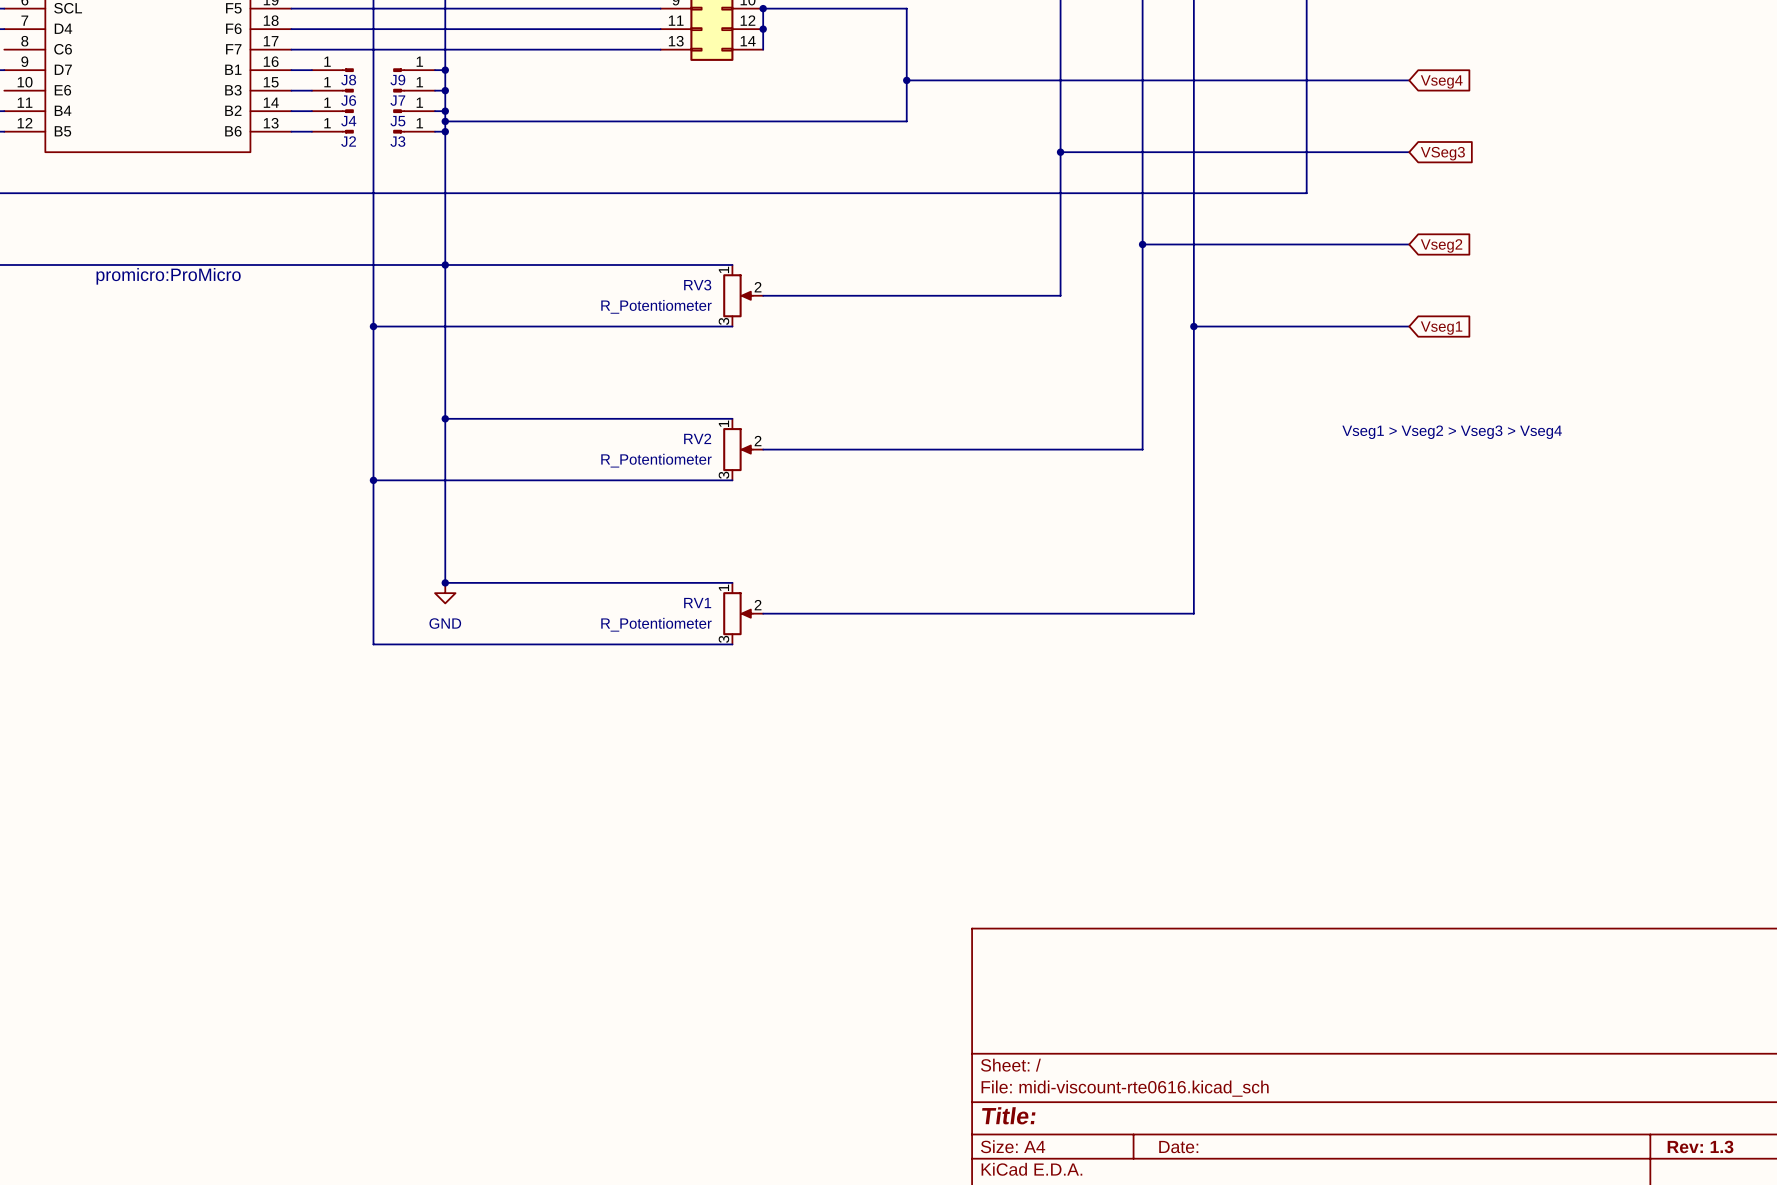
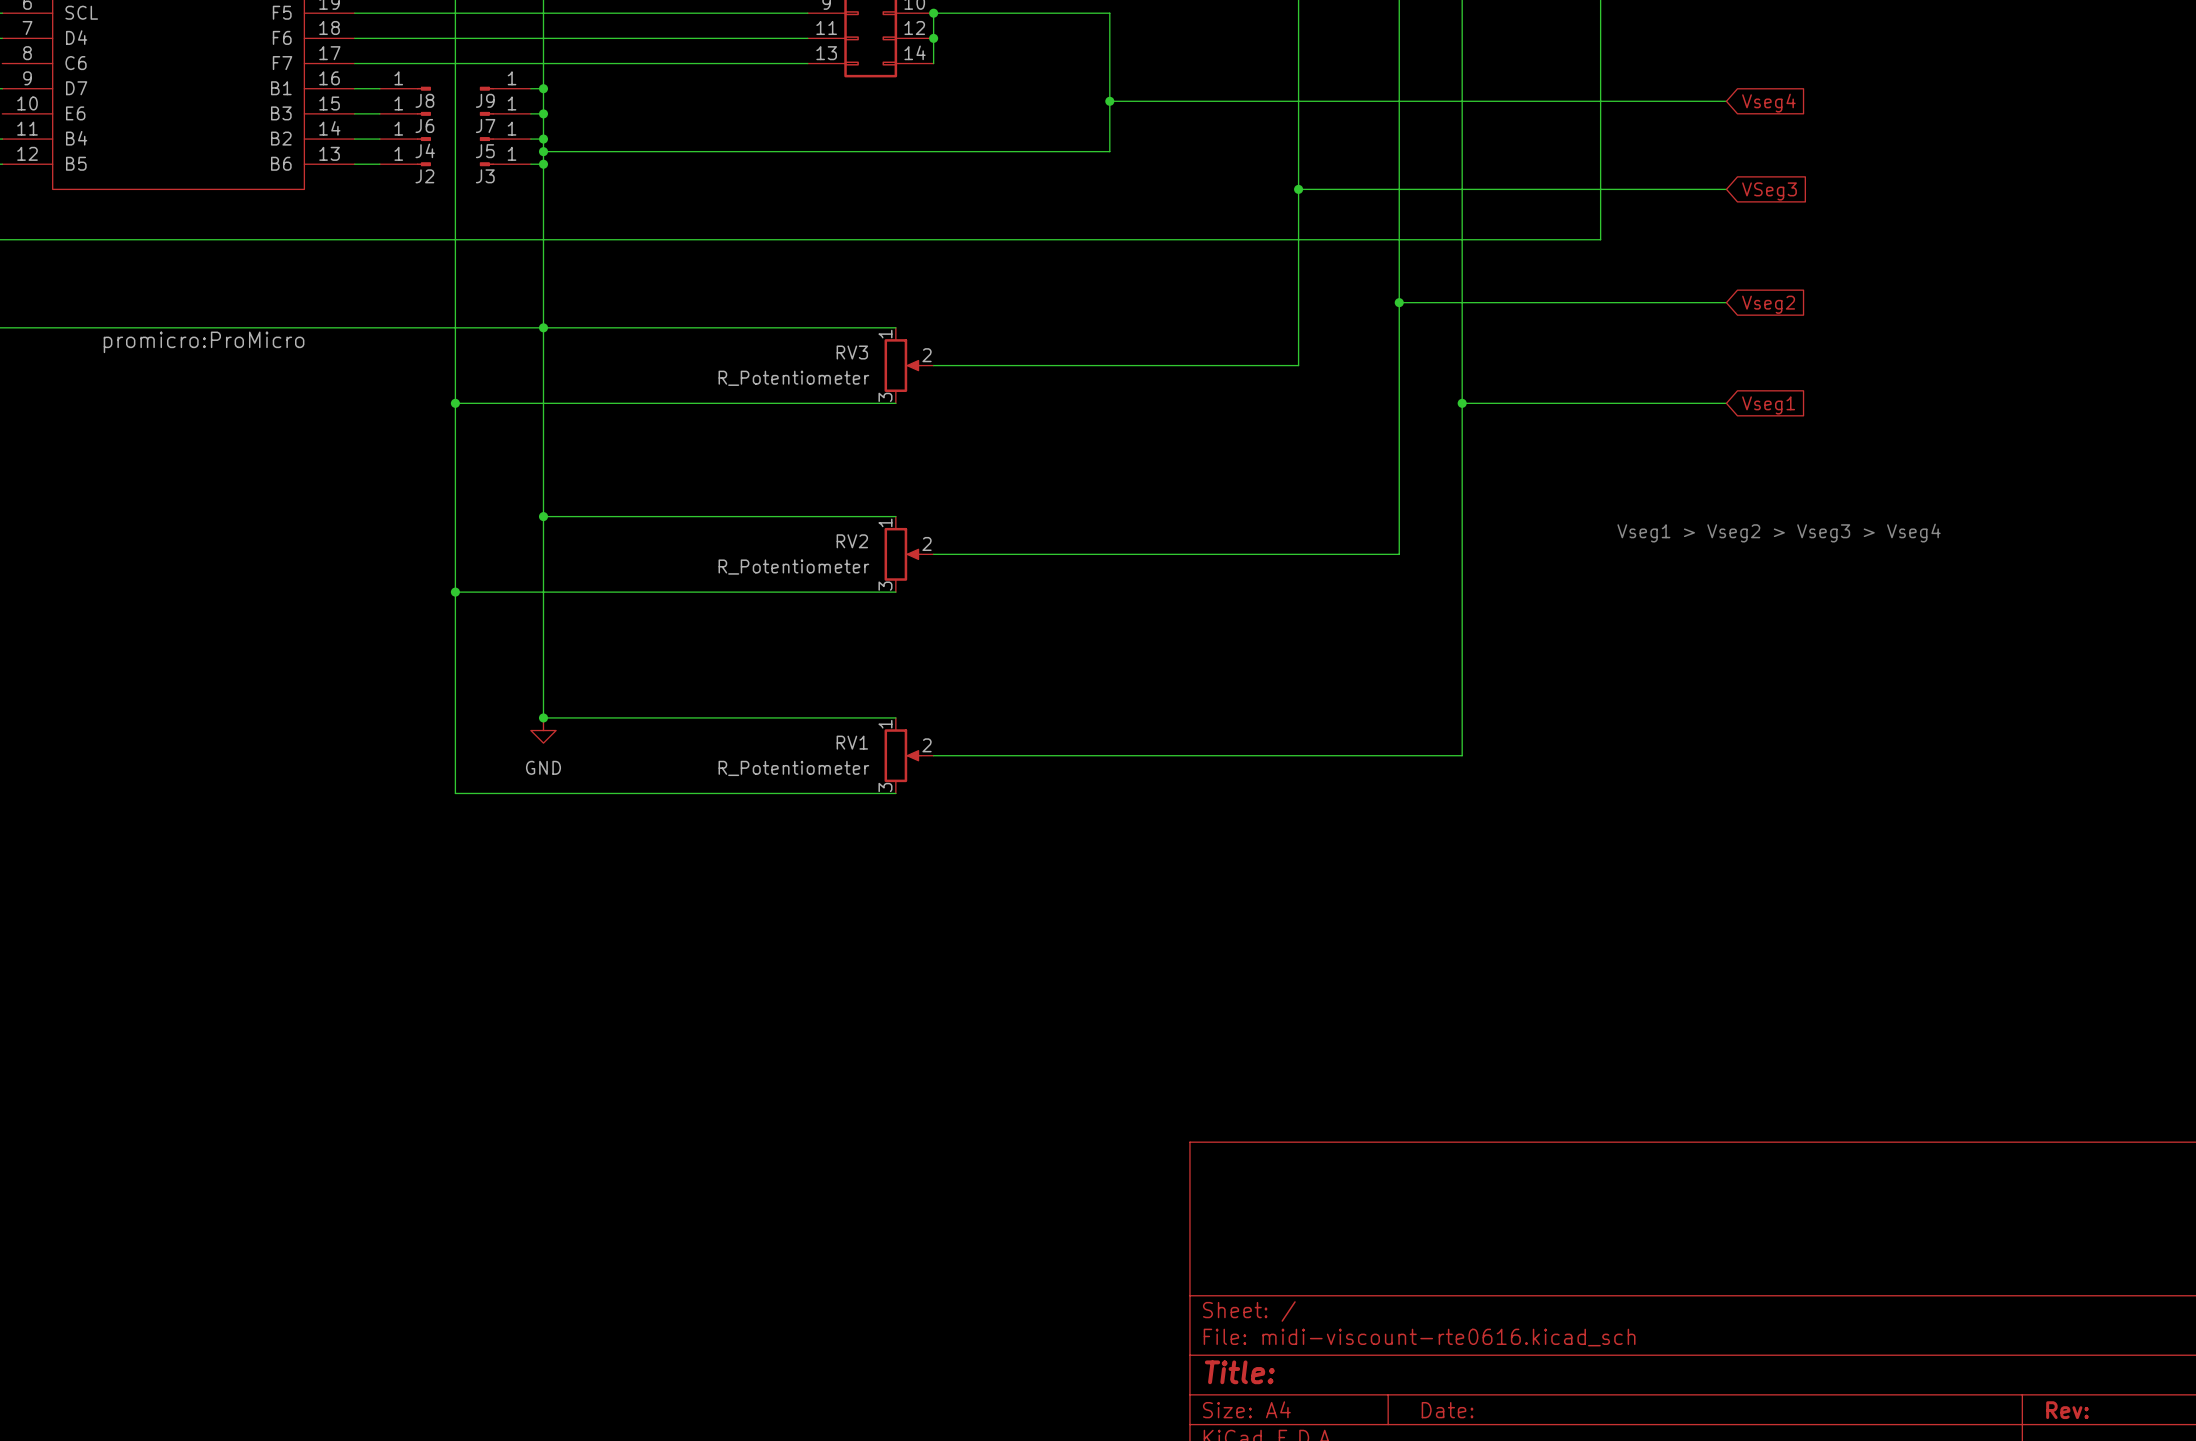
title block: Rev: 1.3 (1700, 1146) -> Rev: (2067, 1410)

